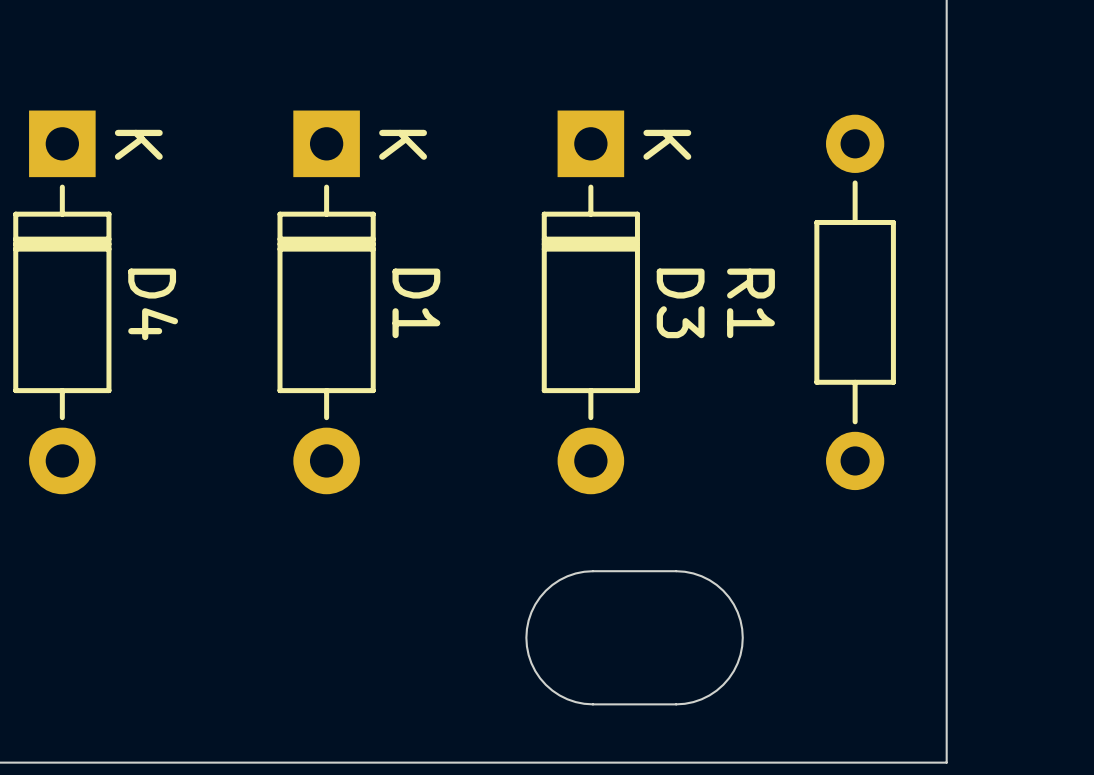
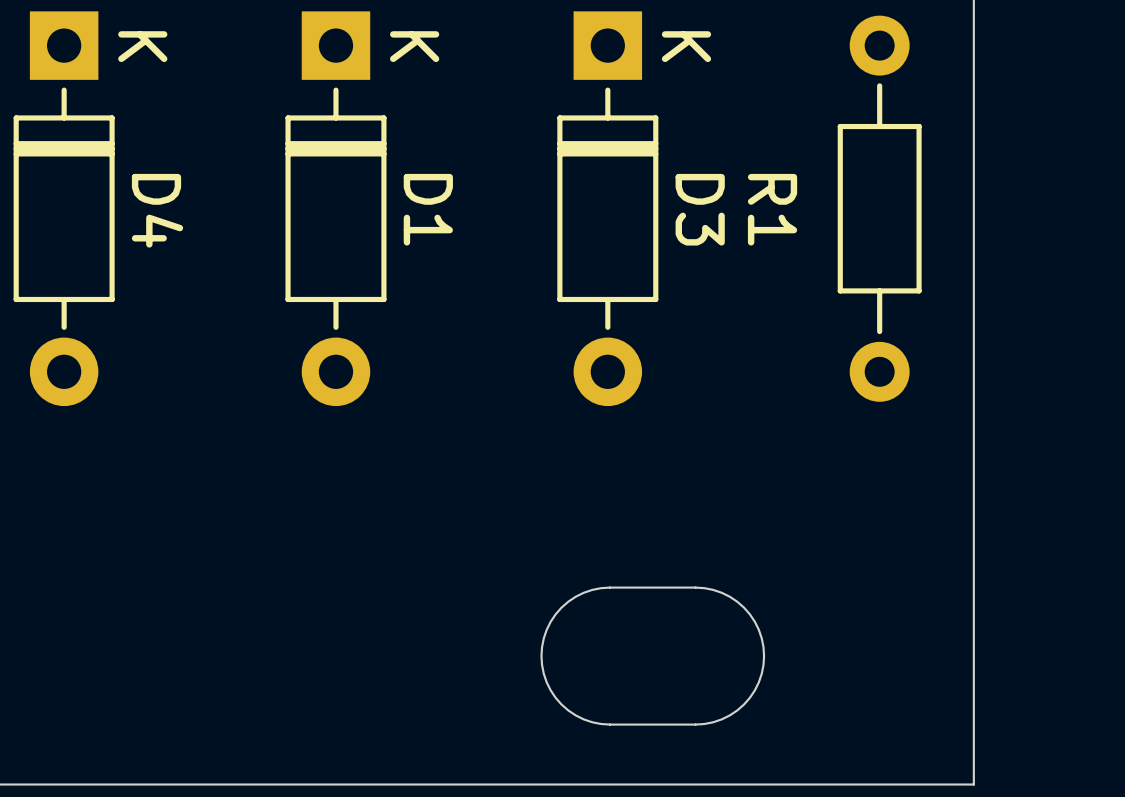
D4 position: (62, 302) -> (64, 208)
D1 position: (326, 302) -> (335, 208)
D3 position: (590, 302) -> (607, 208)
R1 position: (855, 302) -> (879, 208)

